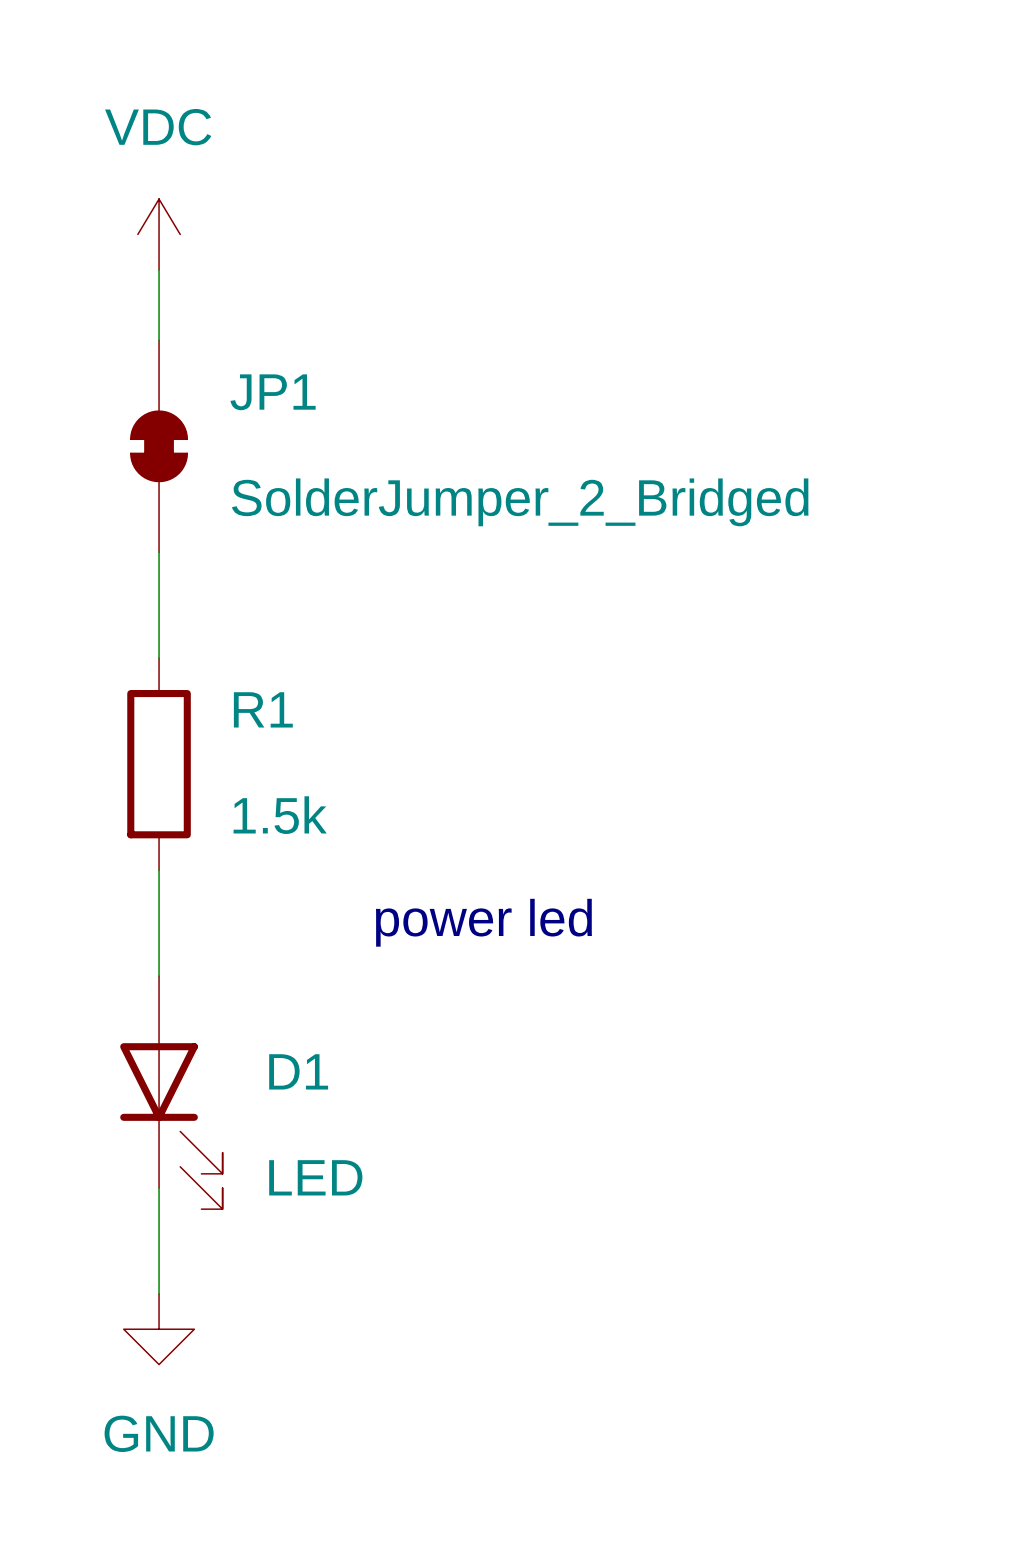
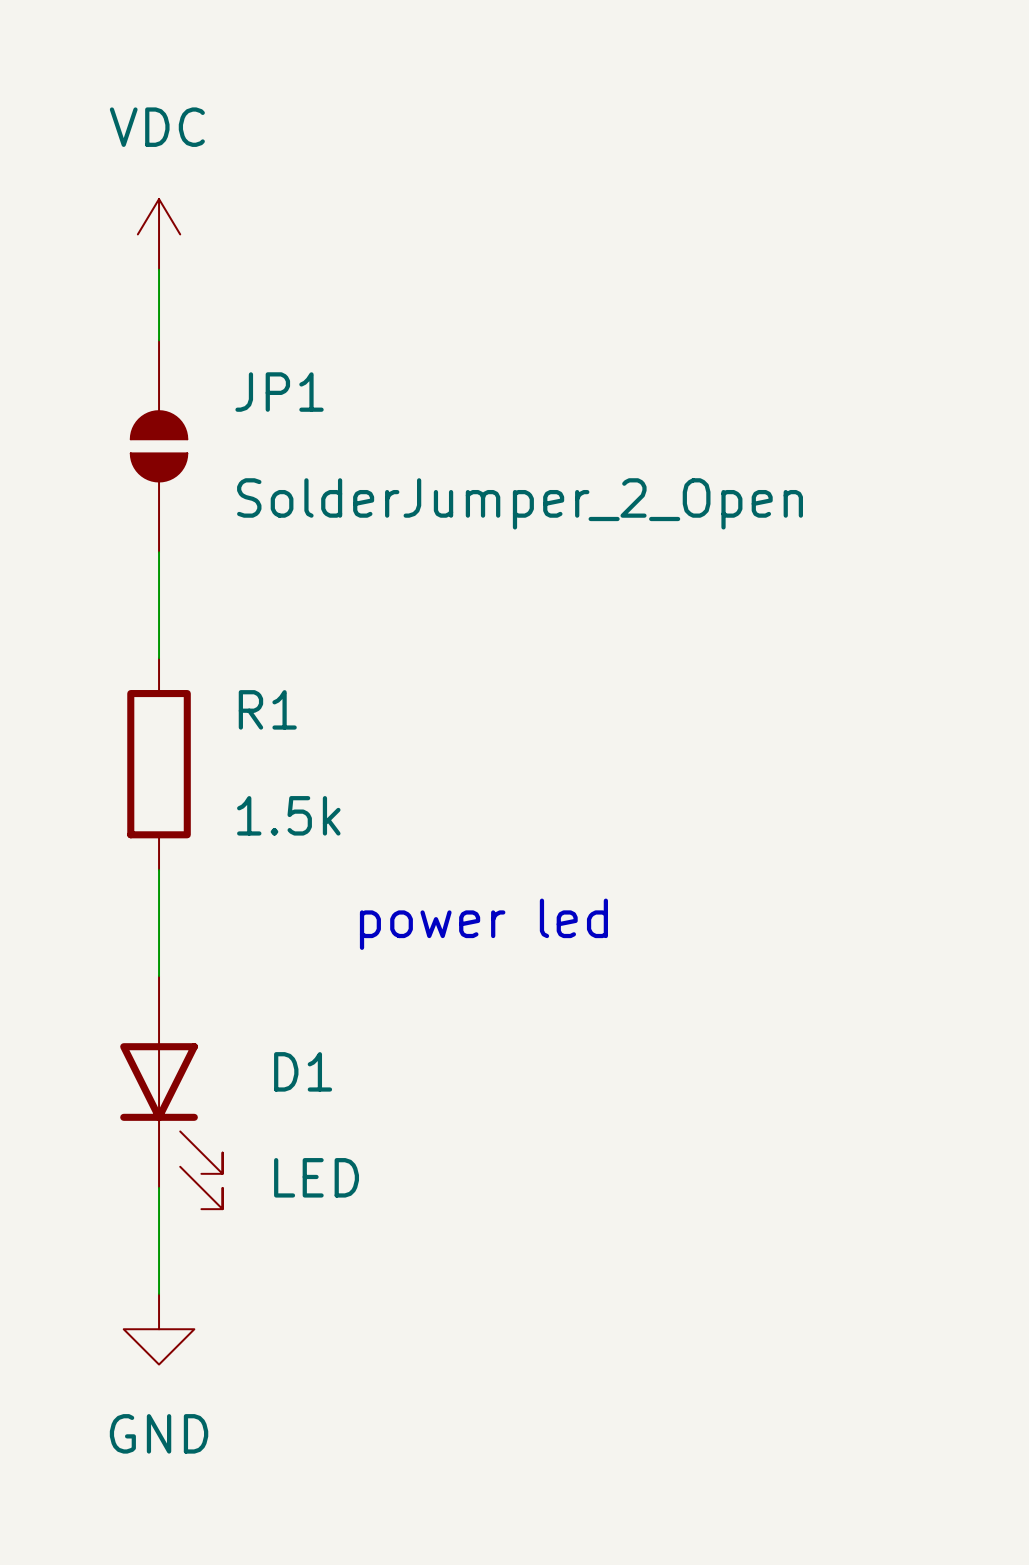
JP1 symbol: [130, 340, 188, 553] -> [130, 340, 188, 553]
JP1 value: SolderJumper_2_Bridged (520, 502) -> SolderJumper_2_Open (520, 503)

